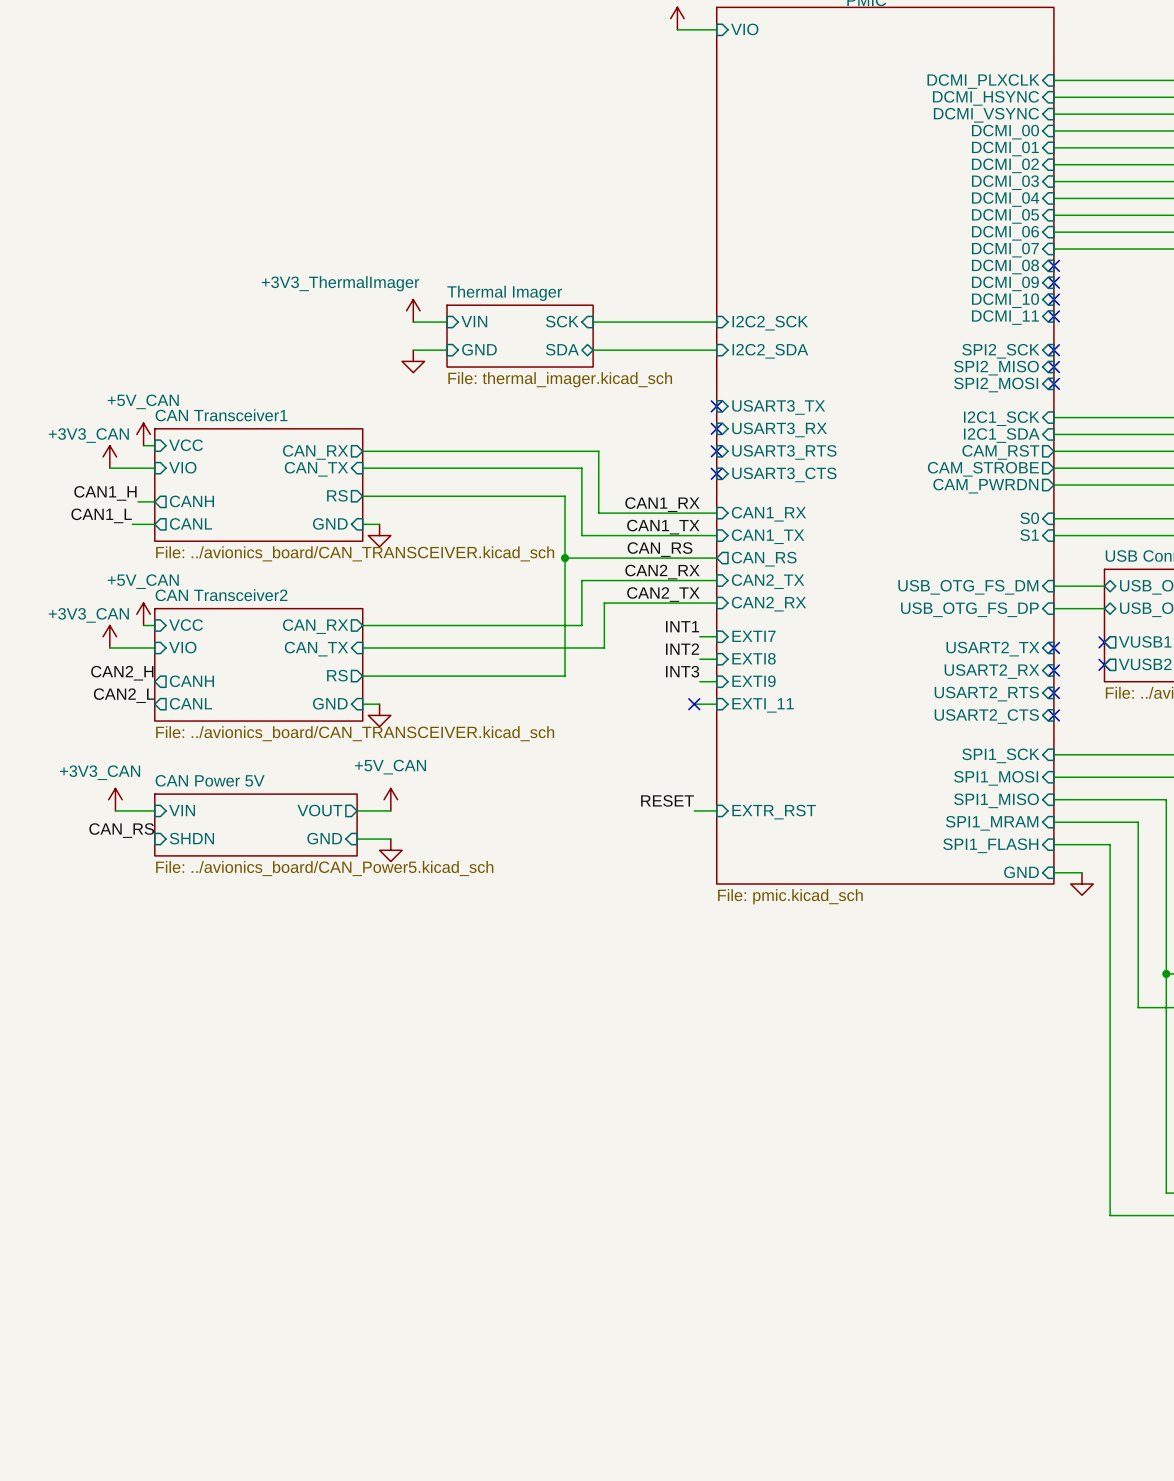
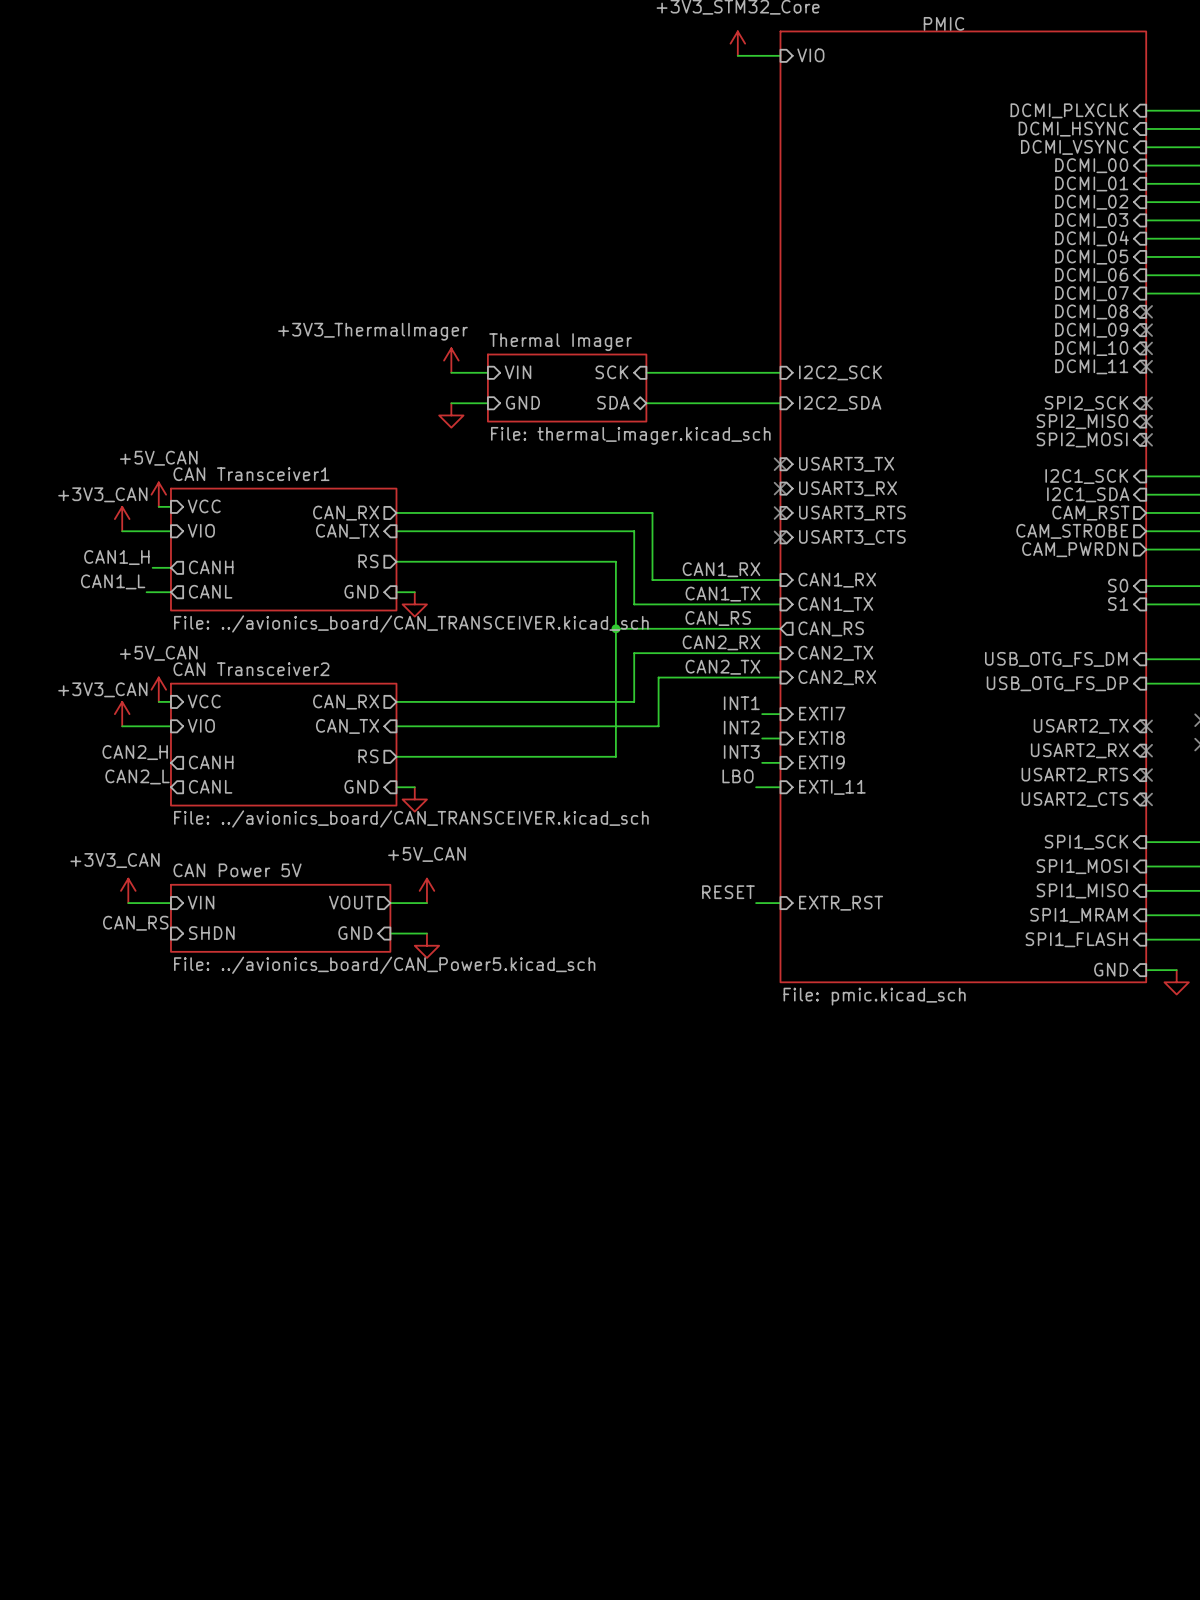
label: none -> LBO (738, 776)
no-connect mark: (694, 704) -> none

